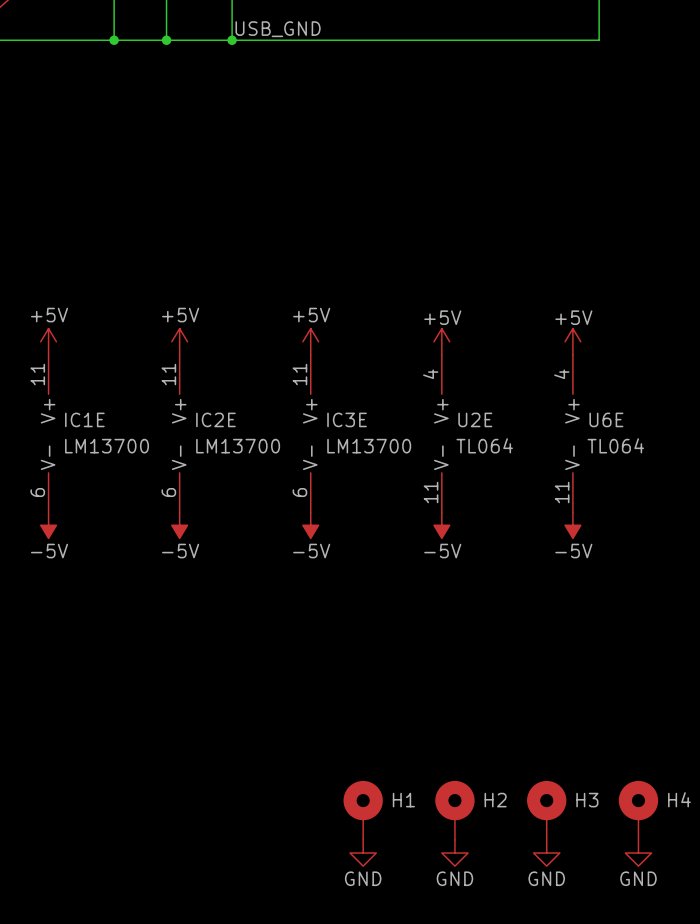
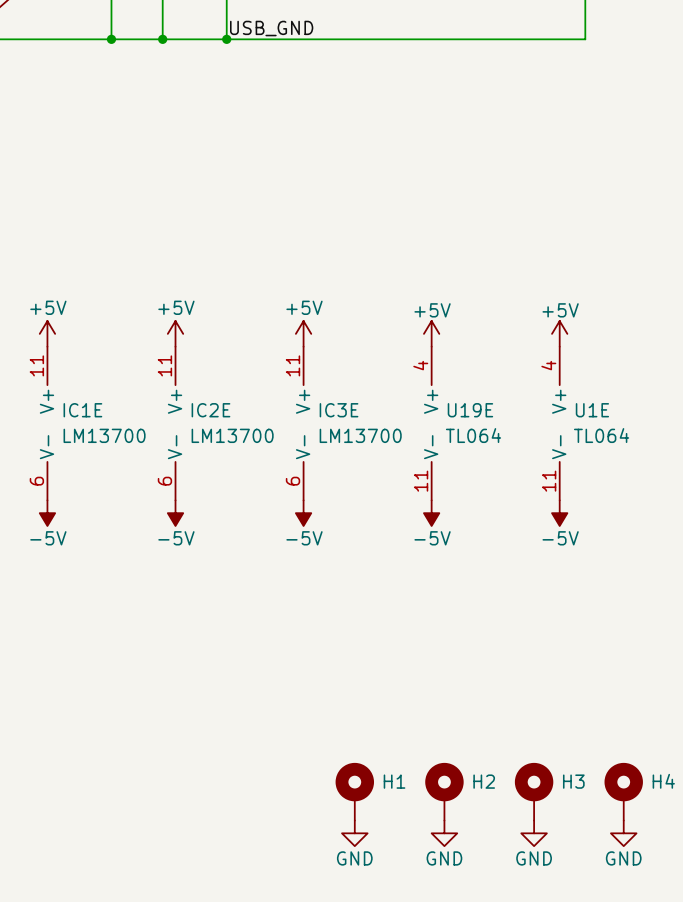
U2E name: U2E (475, 419) -> U19E (470, 410)
U6E name: U6E (606, 419) -> U1E (592, 410)

